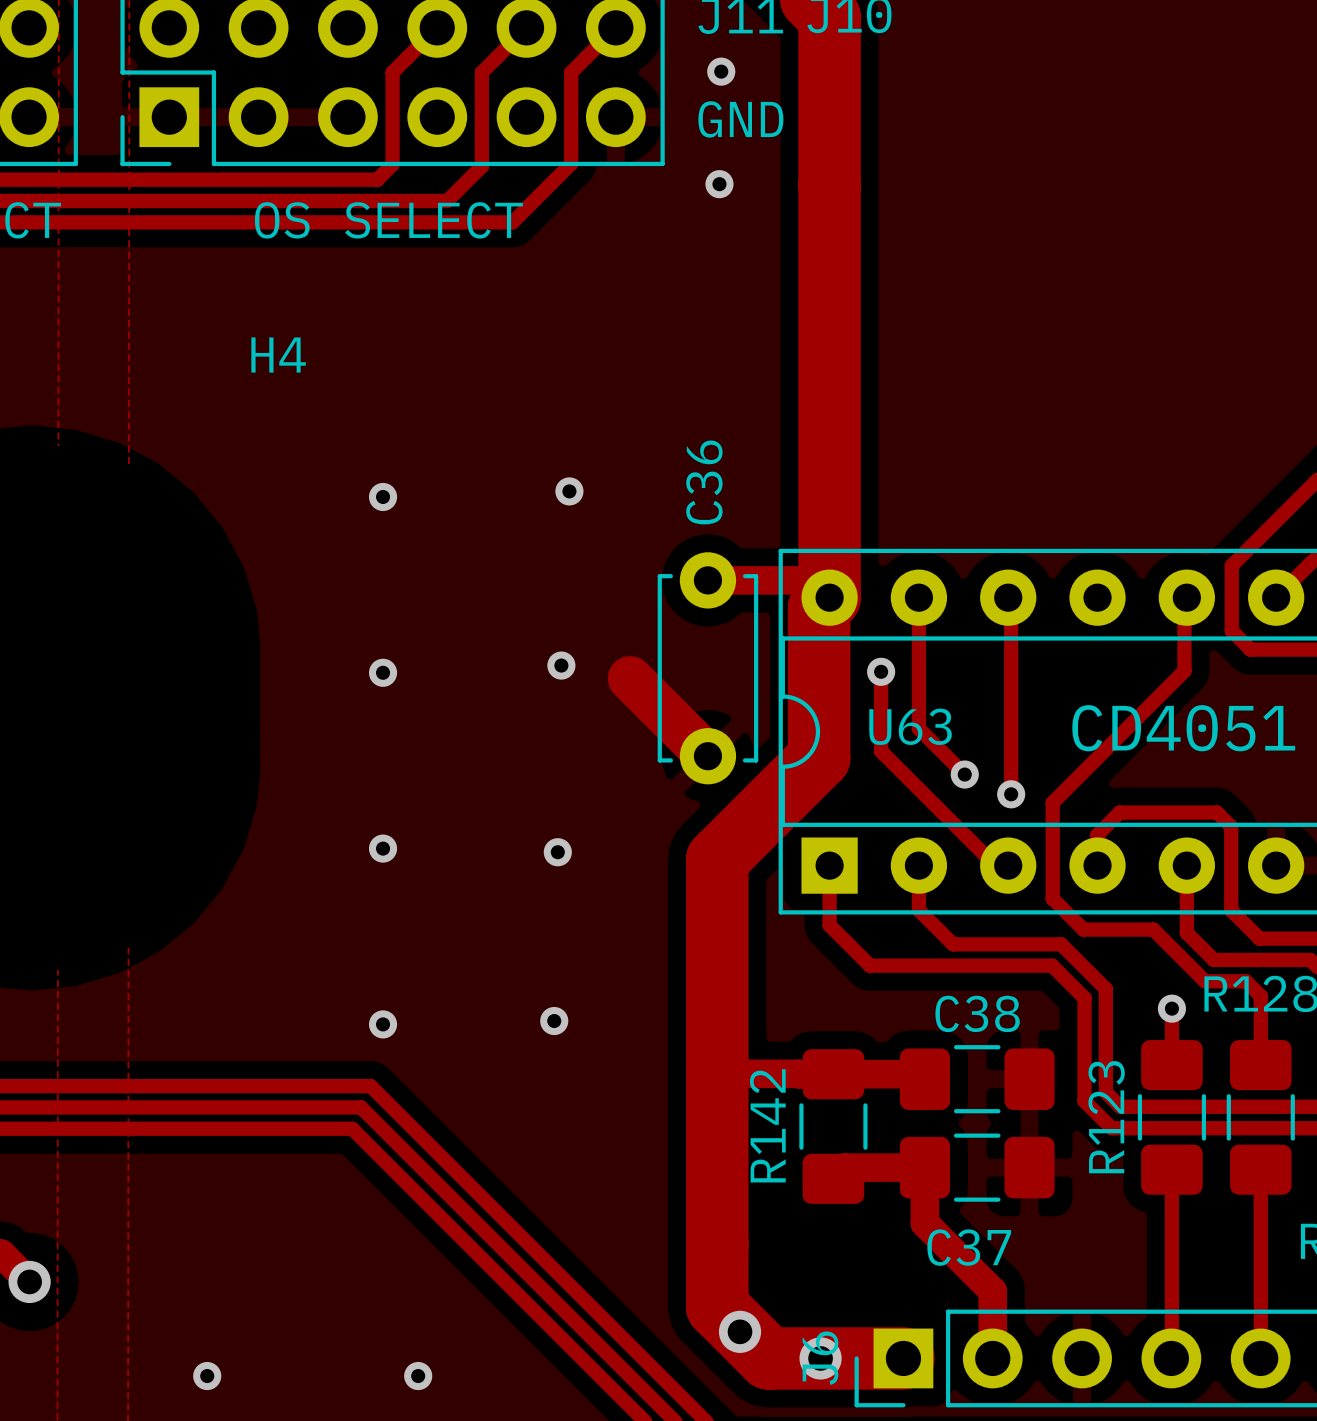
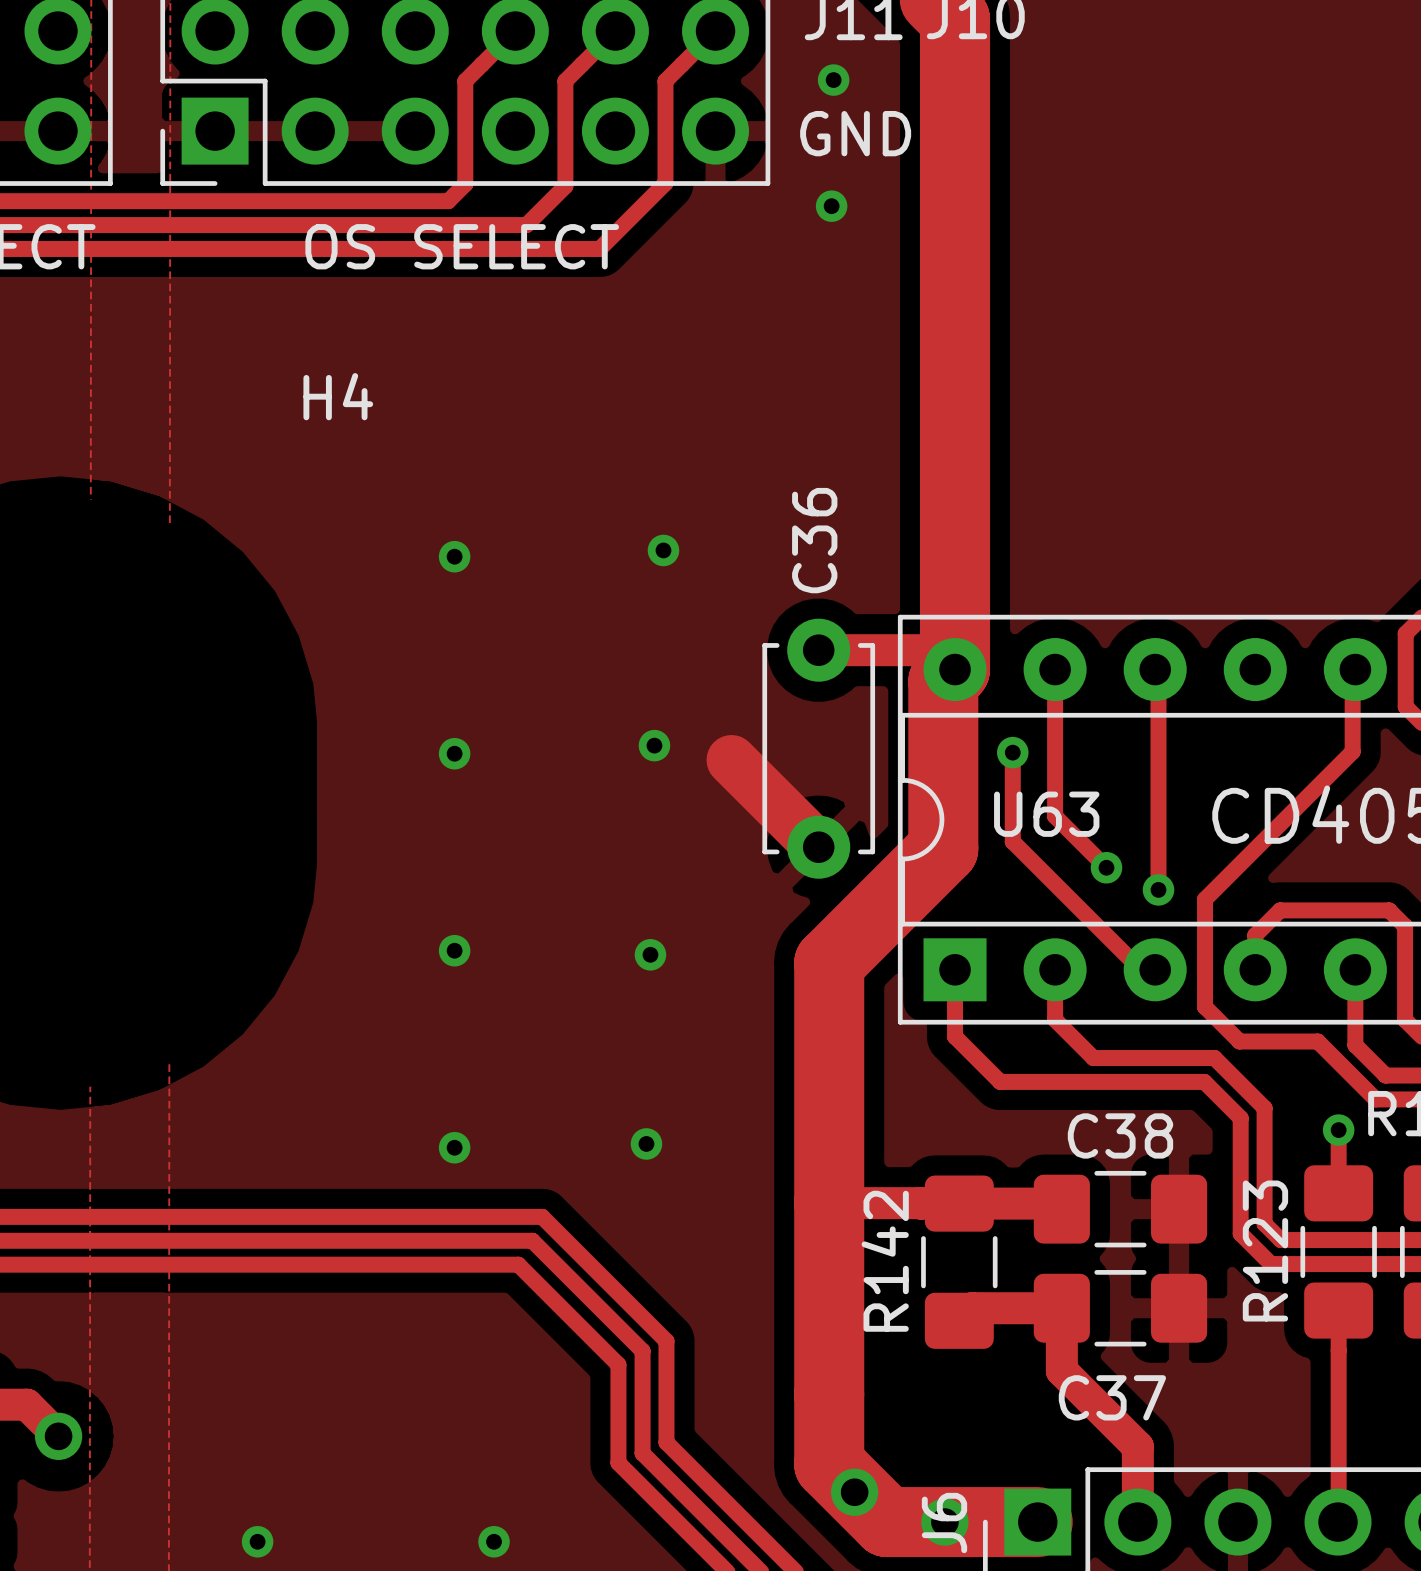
track: (370, 1086) (572, 1287) -> (440, 1216) (542, 1216) (666, 1341) (666, 1442)
track: (361, 1107) (550, 1297) -> (430, 1240) (532, 1240) (642, 1350) (642, 1453)
track: (352, 1128) (529, 1305) -> (420, 1264) (518, 1264) (618, 1364) (618, 1462)

